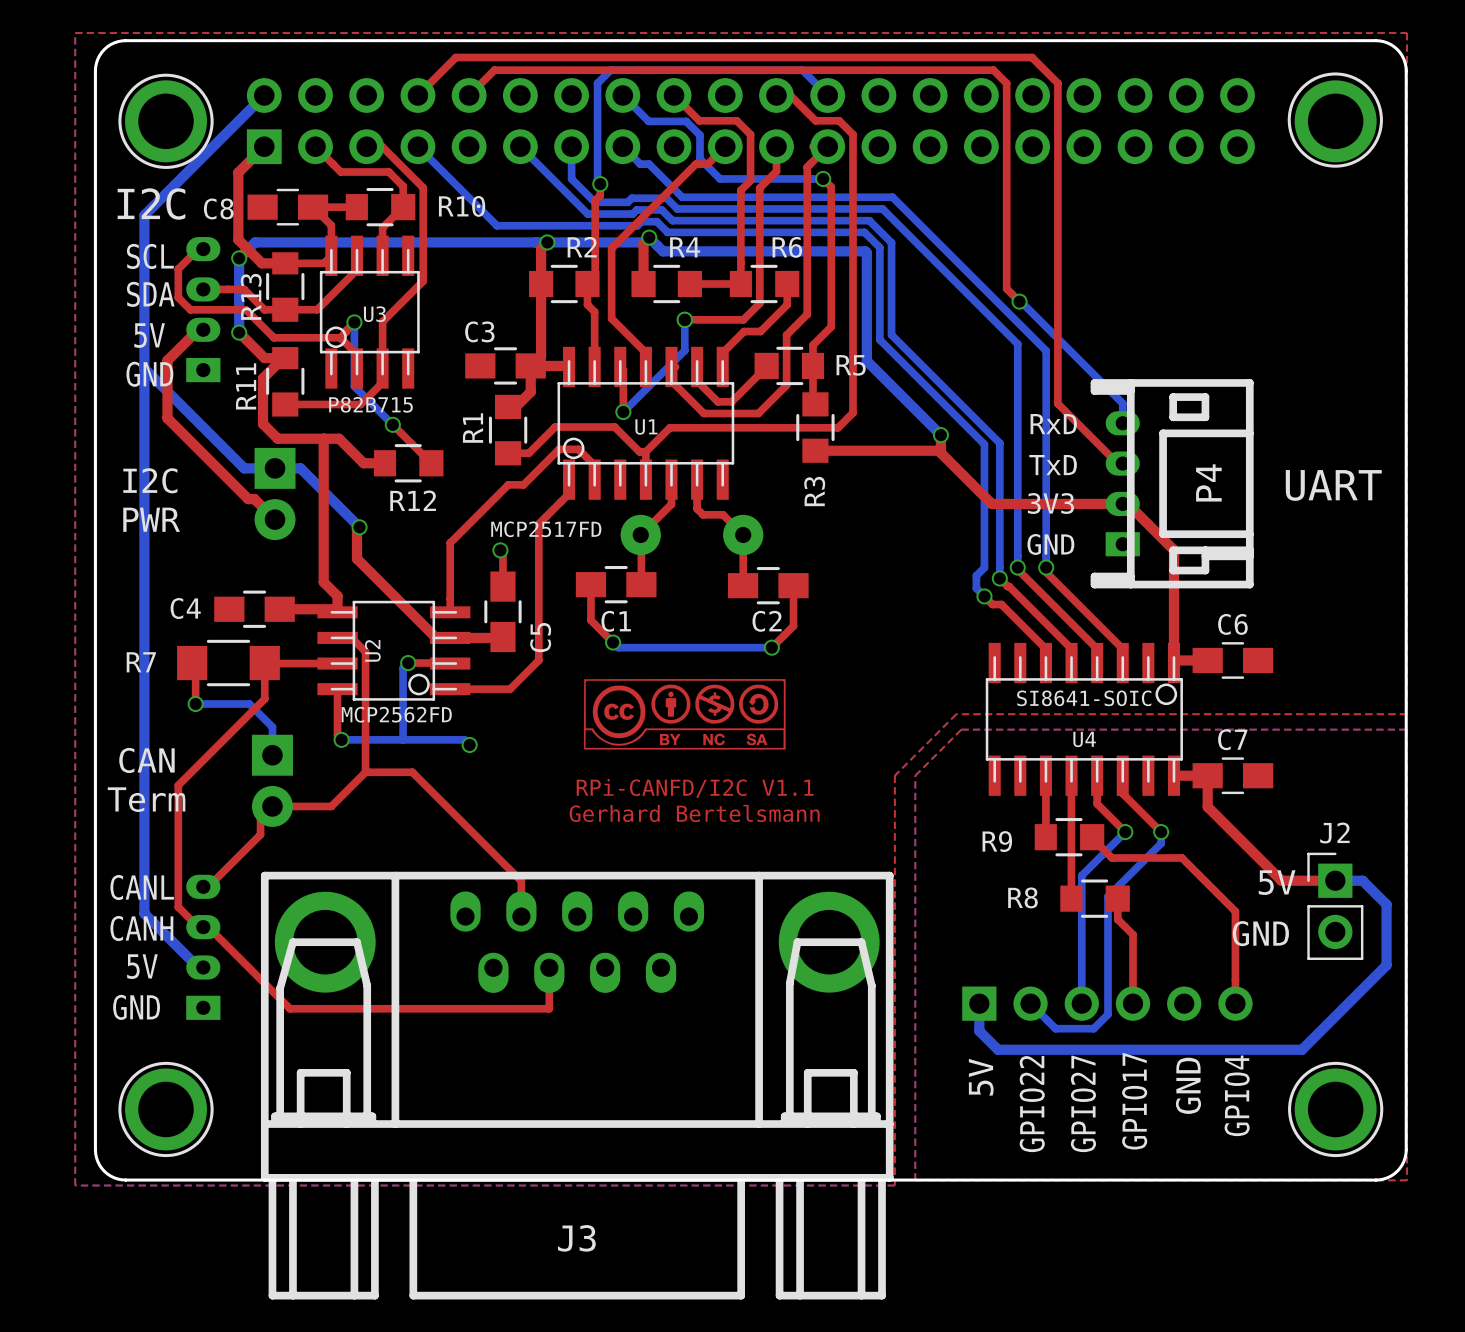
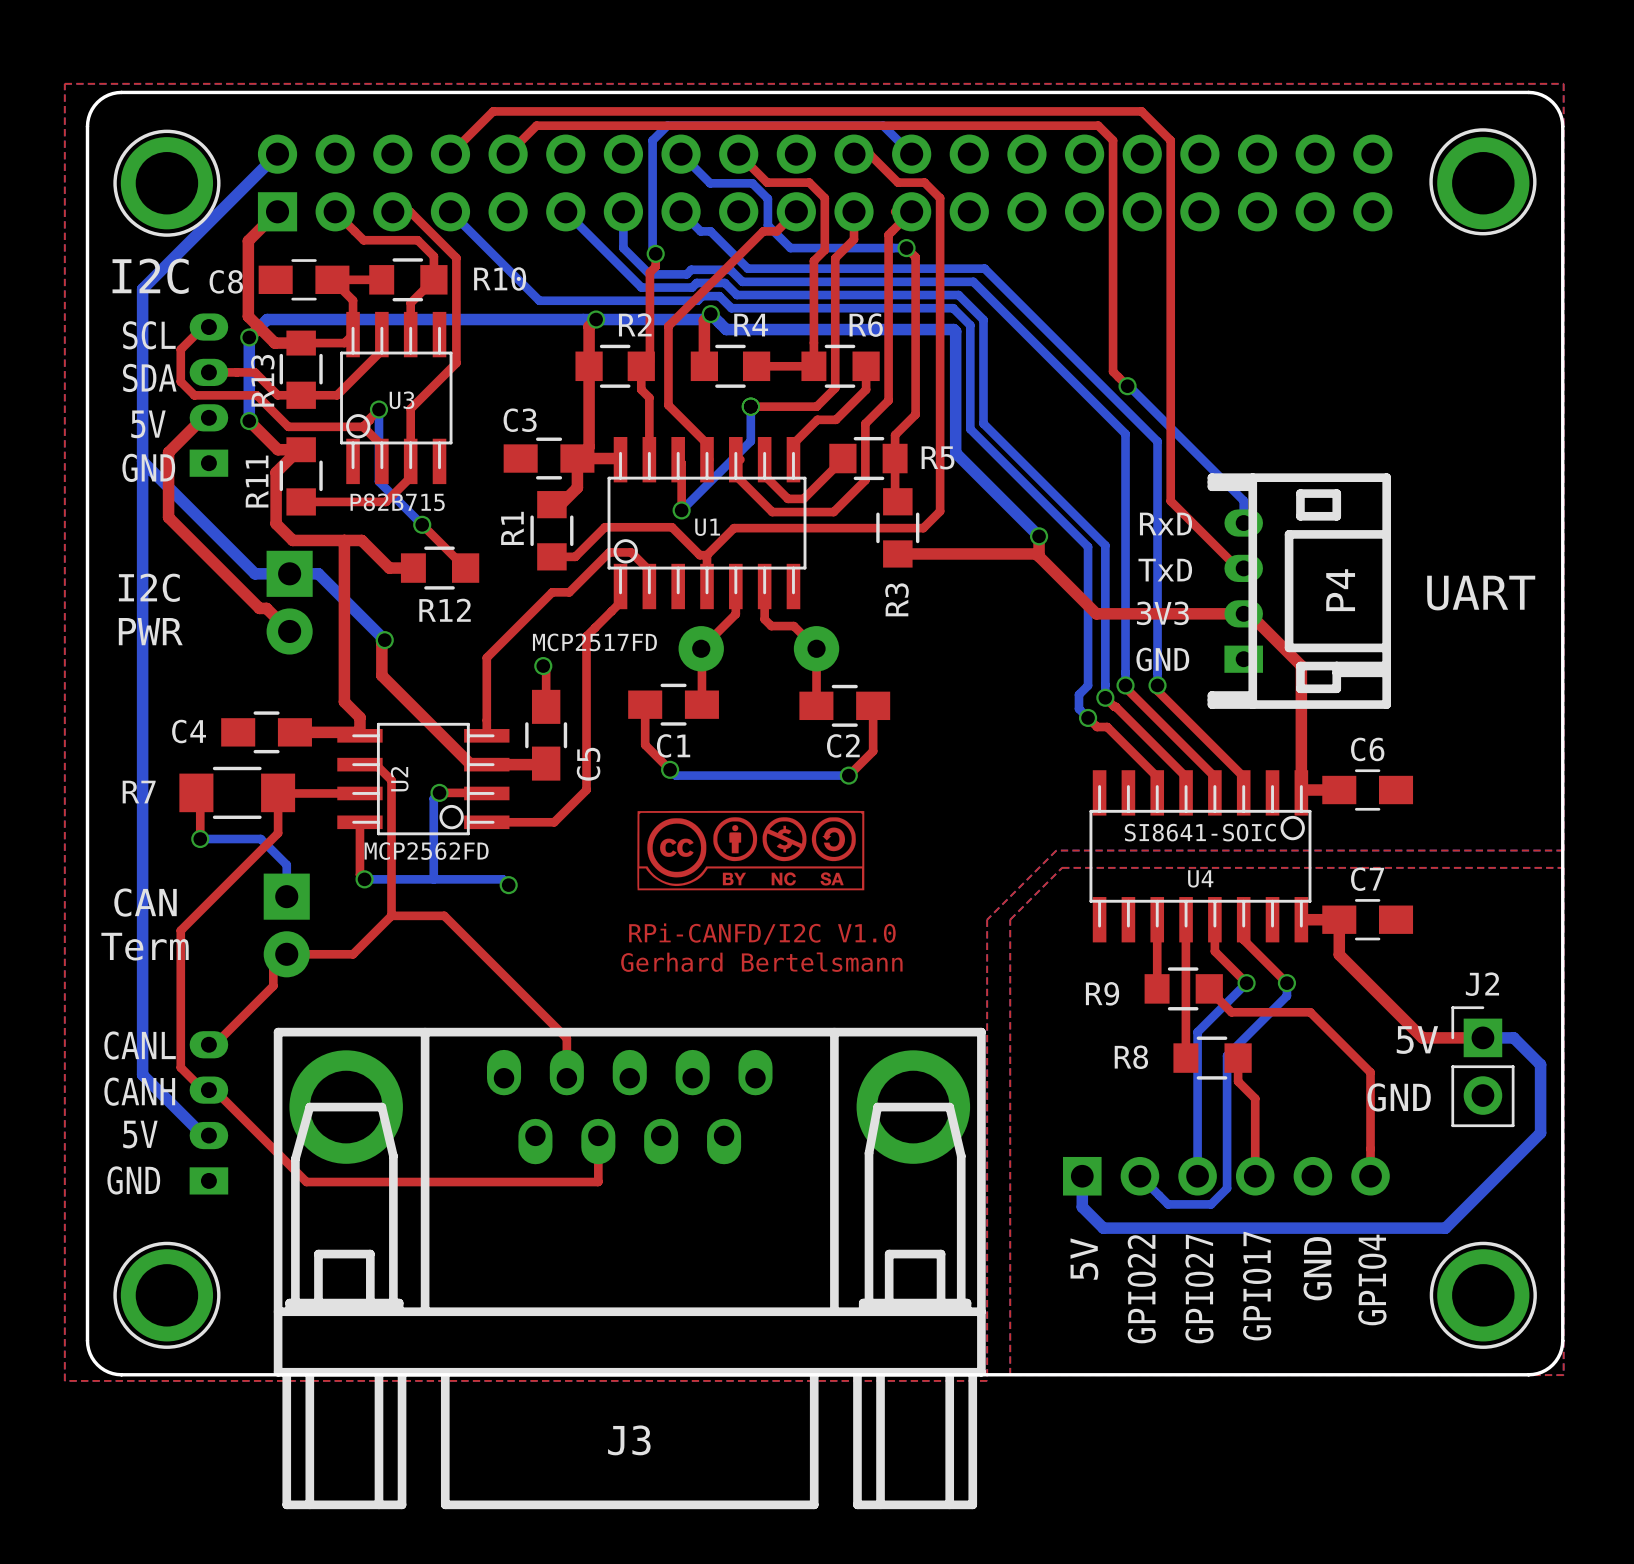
text: RPi-CANFD/I2C V1.1 (695, 788) -> RPi-CANFD/I2C V1.0 (762, 934)

